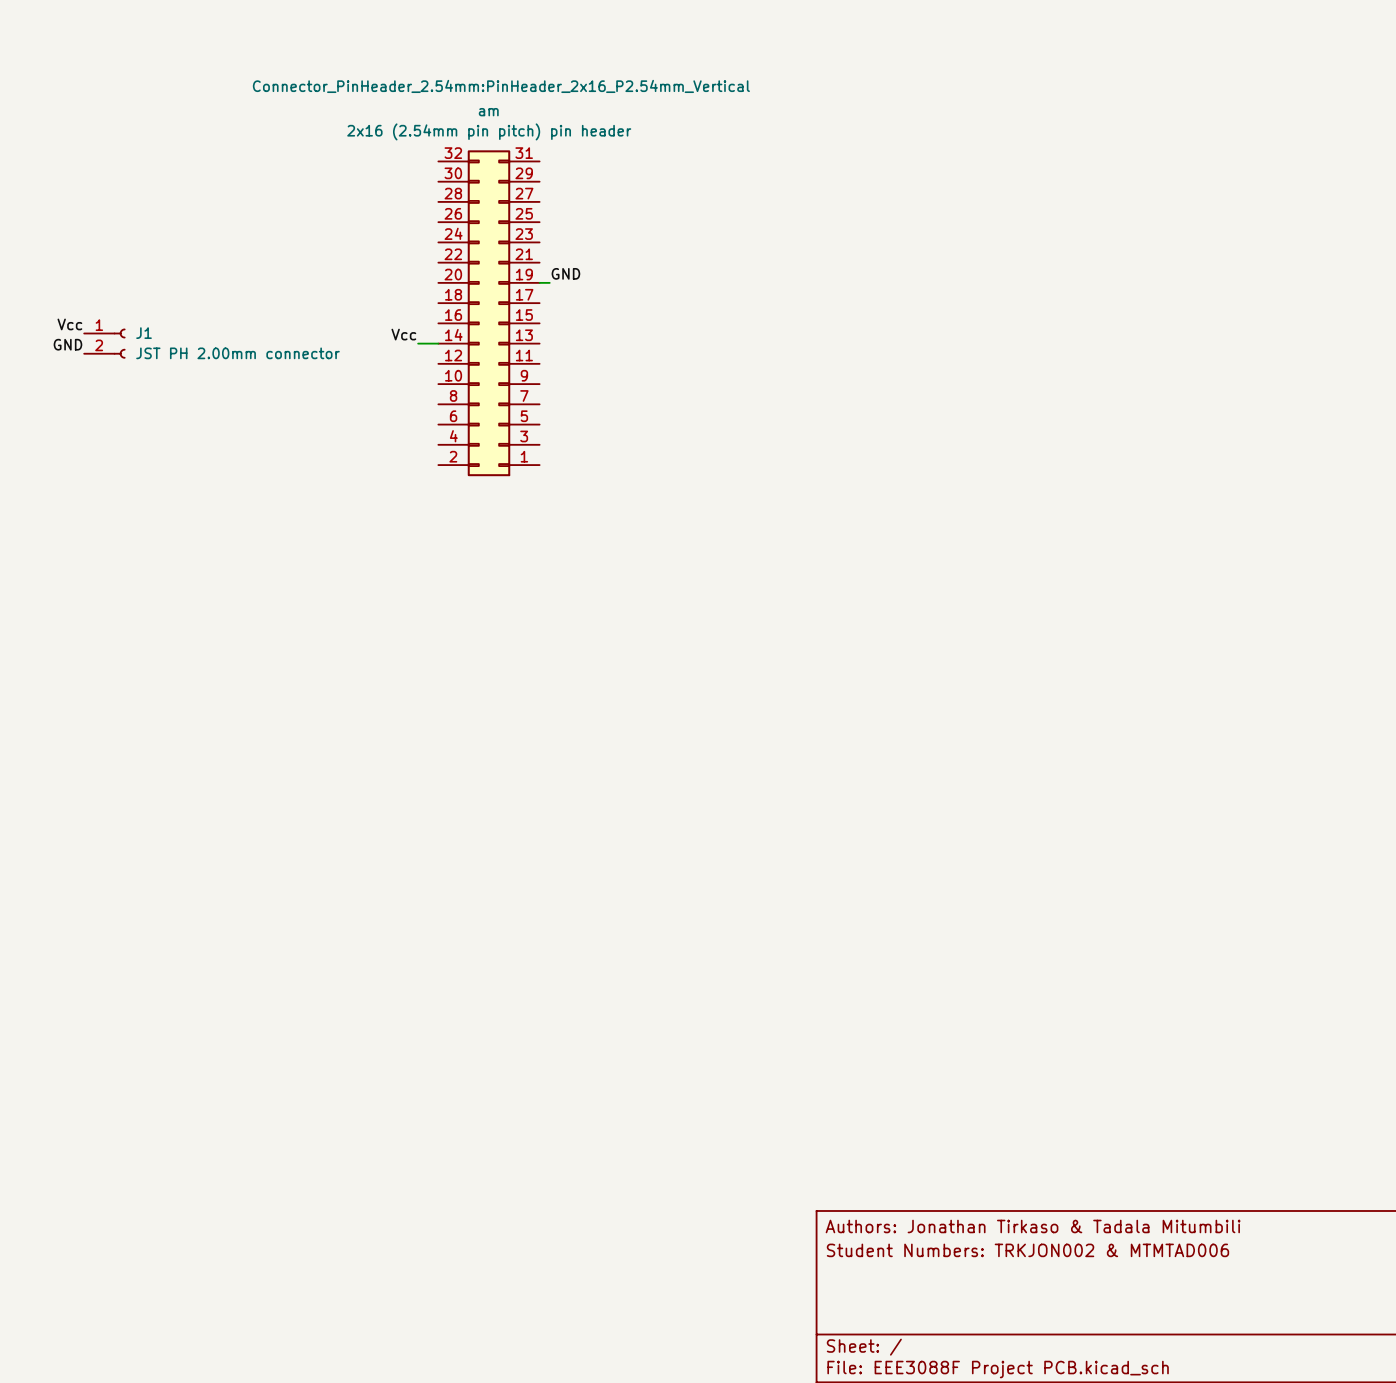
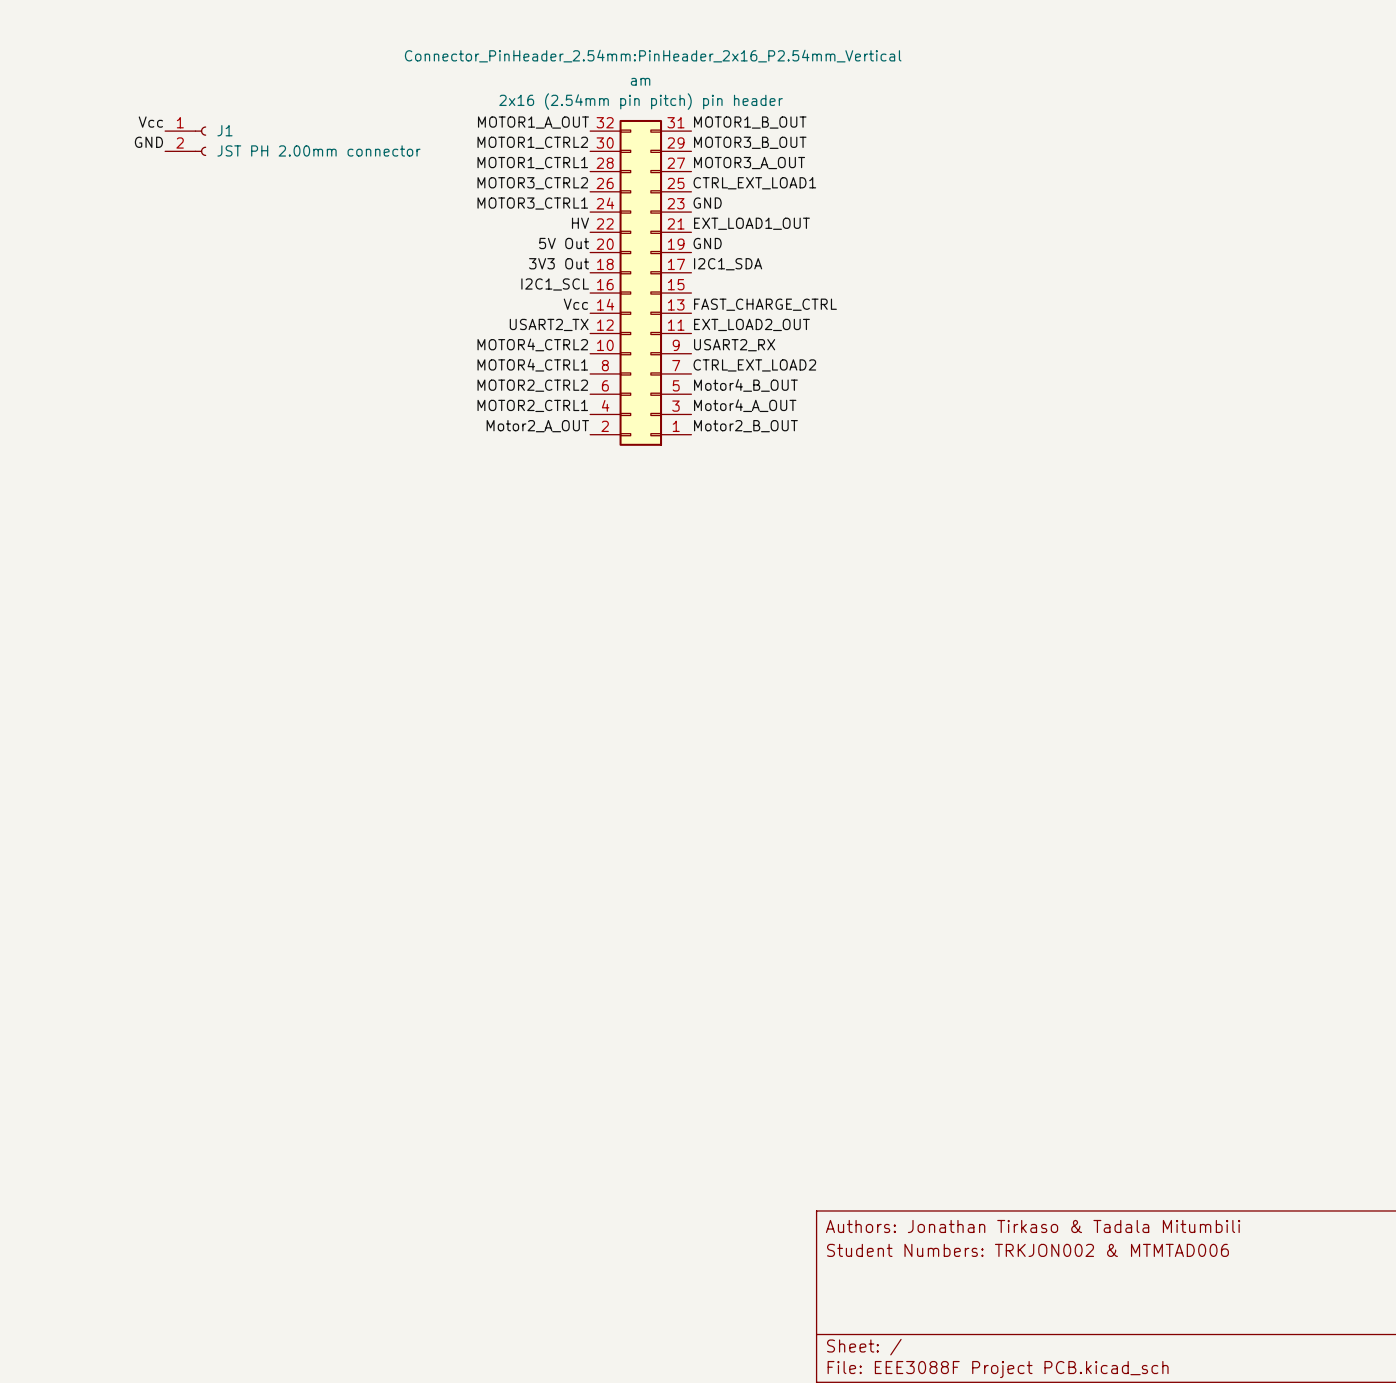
label: none -> Vcc (150, 122)
label: none -> MOTOR1_A_OUT (533, 122)
label: none -> MOTOR1_B_OUT (750, 122)
label: none -> GND (148, 142)
label: none -> MOTOR1_CTRL2 (532, 142)
label: none -> MOTOR3_B_OUT (750, 142)
label: none -> MOTOR1_CTRL1 (532, 163)
label: none -> MOTOR3_A_OUT (749, 163)
label: none -> MOTOR3_CTRL2 (532, 183)
label: none -> CTRL_EXT_LOAD1 (754, 183)
label: none -> MOTOR3_CTRL1 (532, 203)
label: none -> GND (707, 203)
label: none -> HV (580, 223)
label: none -> EXT_LOAD1_OUT (751, 223)
label: none -> 5V Out (564, 243)
label: none -> GND (707, 243)
label: none -> 3V3 Out (559, 263)
label: none -> I2C1_SDA (728, 264)
label: GND (565, 273) -> none
wire: (539, 282) (549, 282) -> none
label: none -> I2C1_SCL (555, 284)
label: none -> Vcc (575, 304)
label: none -> FAST_CHARGE_CTRL (765, 304)
am position: (488, 313) -> (640, 282)
label: Vcc (69, 324) -> none
label: none -> USART2_TX (549, 324)
label: none -> EXT_LOAD2_OUT (751, 324)
label: Vcc (403, 334) -> none
J1 position: (104, 343) -> (185, 141)
wire: (418, 343) (438, 343) -> none
label: GND (67, 344) -> none
label: none -> MOTOR4_CTRL2 (532, 344)
label: none -> USART2_RX (734, 345)
label: none -> MOTOR4_CTRL1 (532, 365)
label: none -> CTRL_EXT_LOAD2 (754, 365)
label: none -> MOTOR2_CTRL2 (532, 385)
label: none -> Motor4_B_OUT (745, 385)
label: none -> MOTOR2_CTRL1 (532, 405)
label: none -> Motor4_A_OUT (745, 405)
label: none -> Motor2_A_OUT (537, 426)
label: none -> Motor2_B_OUT (745, 426)

